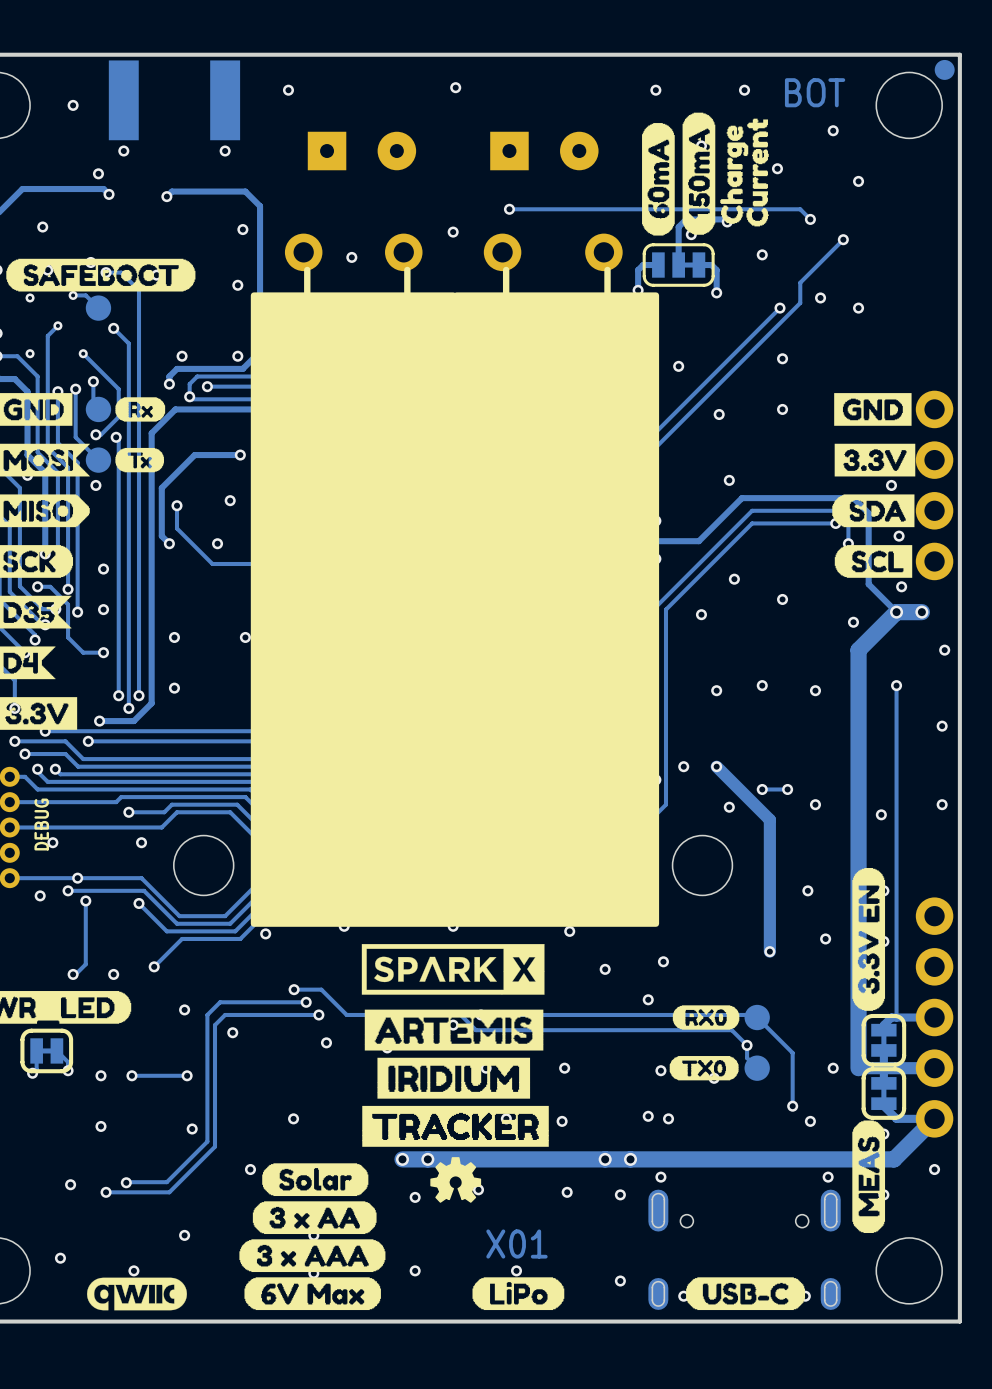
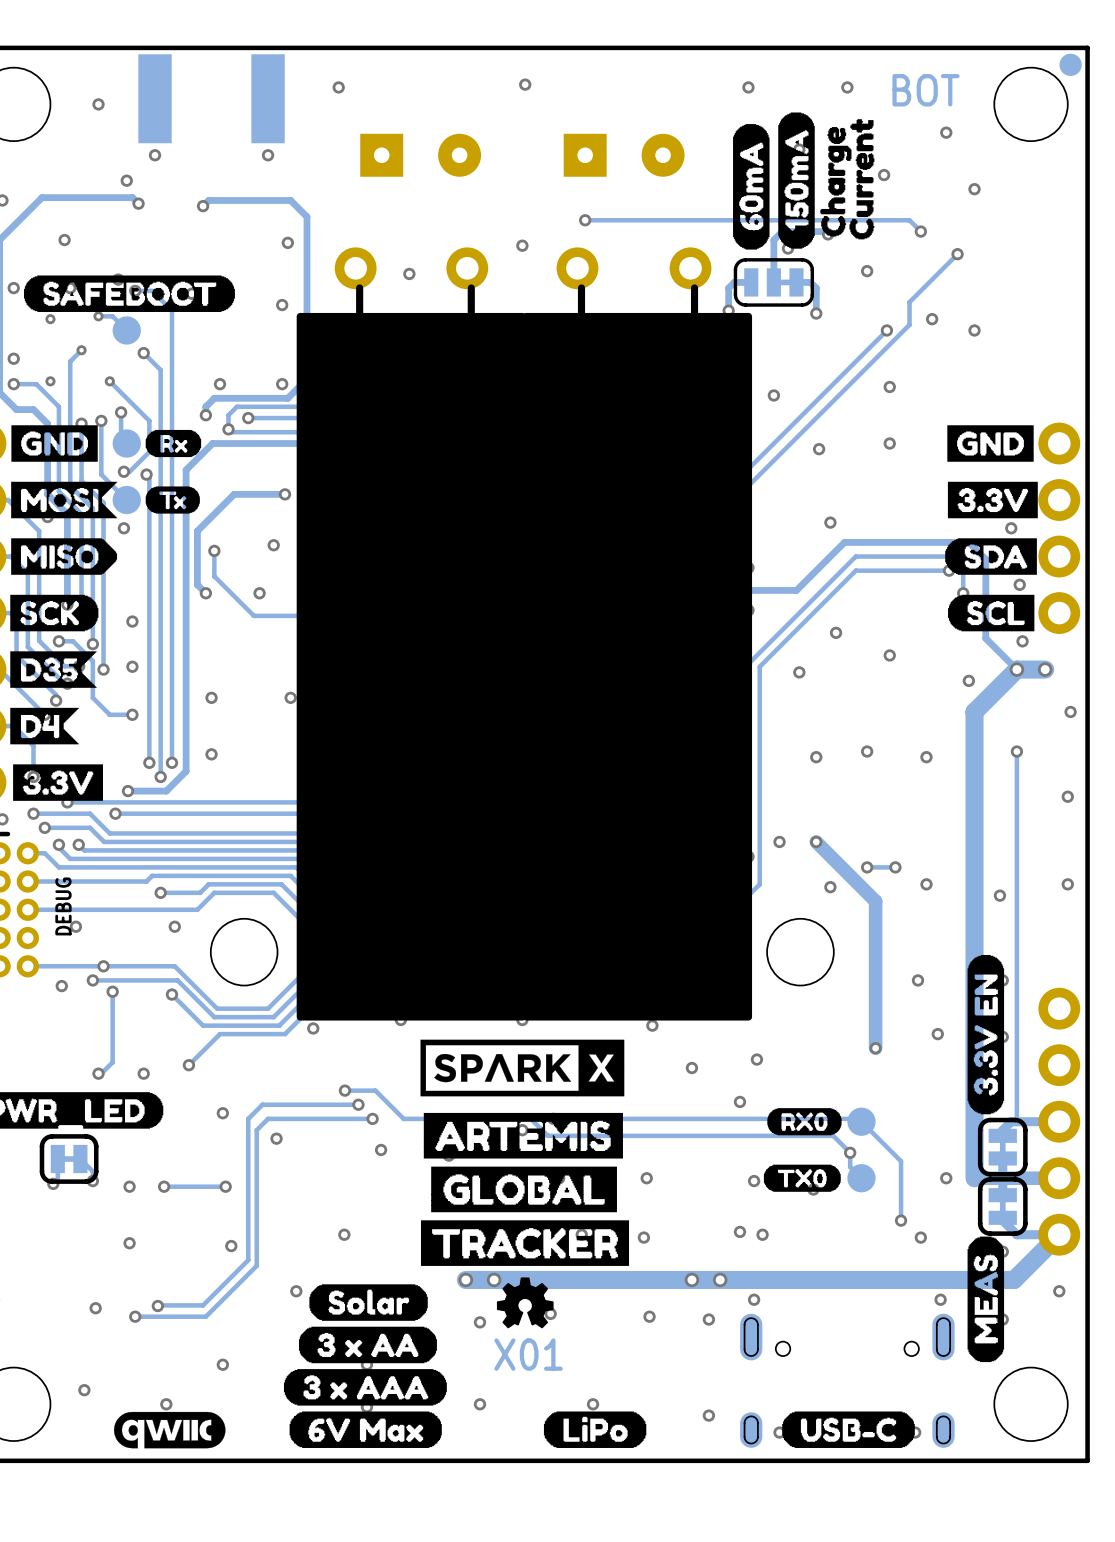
drawing shape: [377, 1057, 531, 1099] -> [431, 1166, 617, 1213]
text position: X01 (516, 1244) -> X01 (528, 1354)

